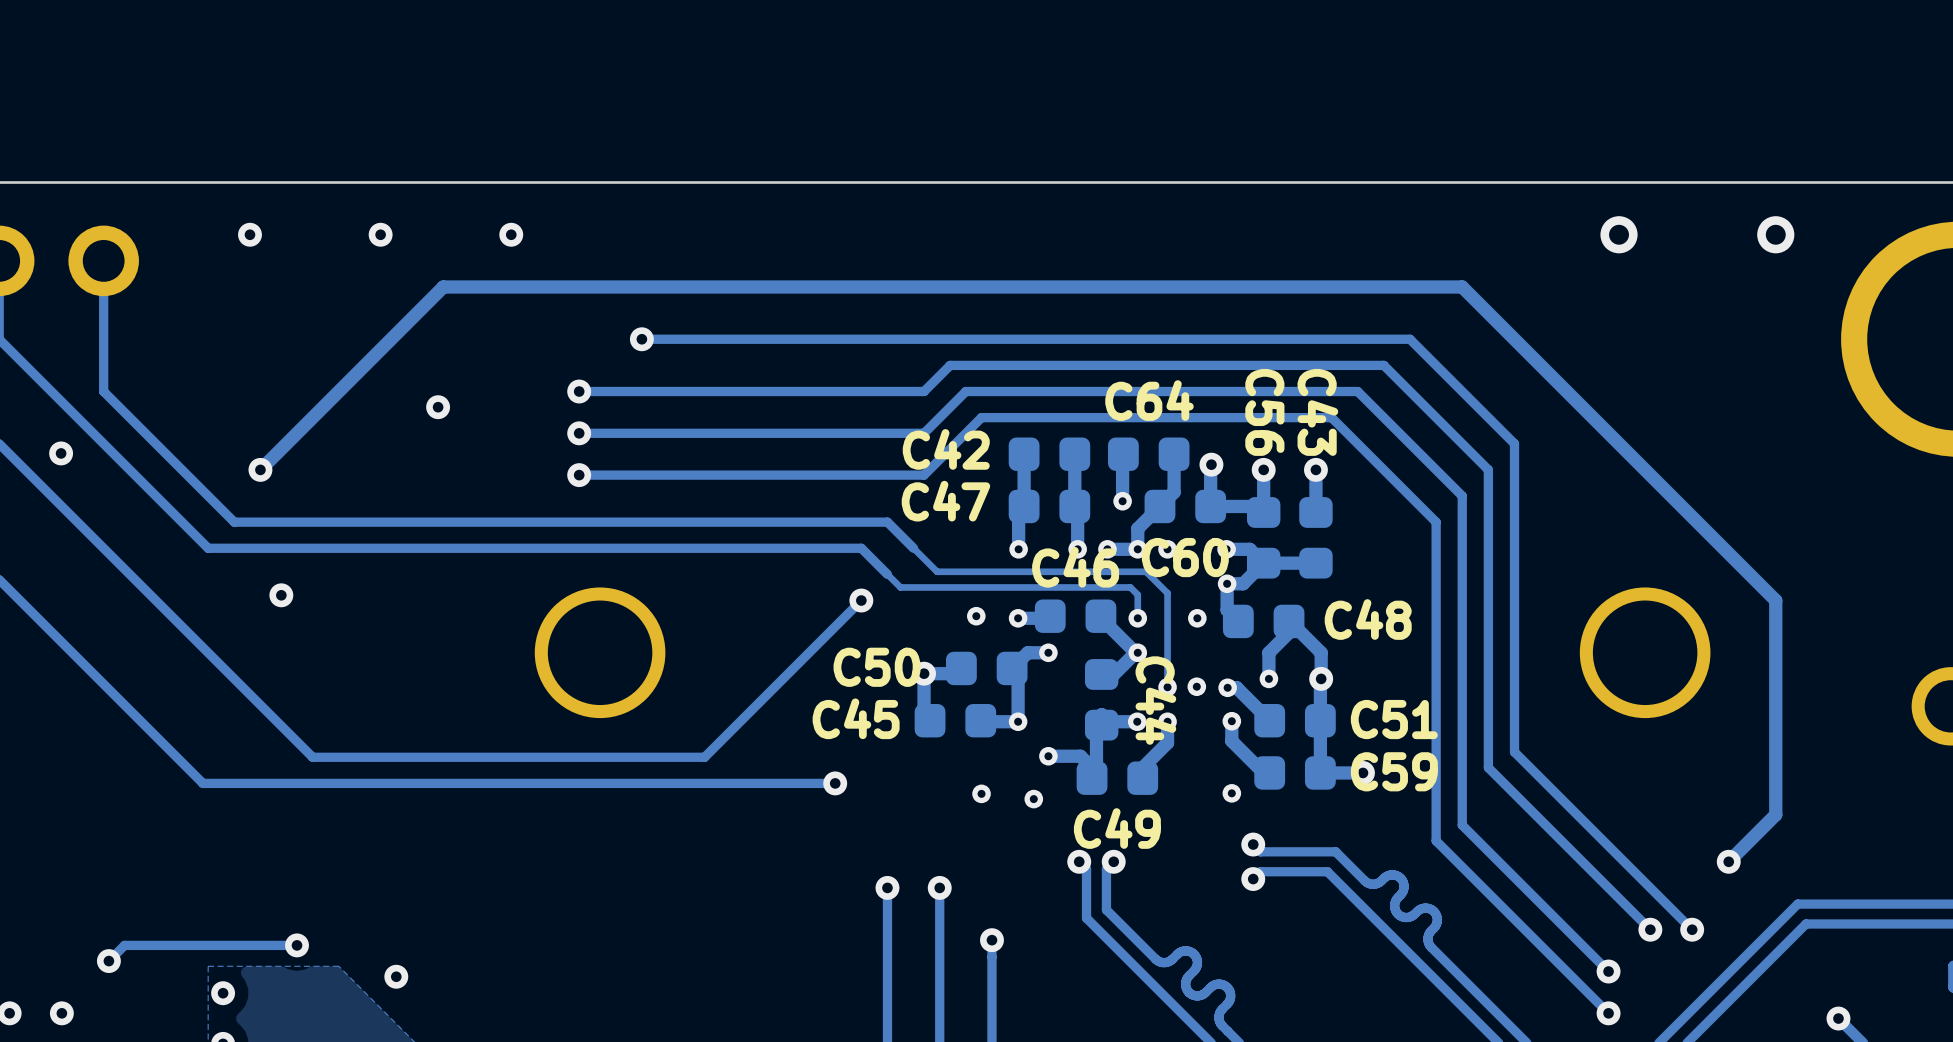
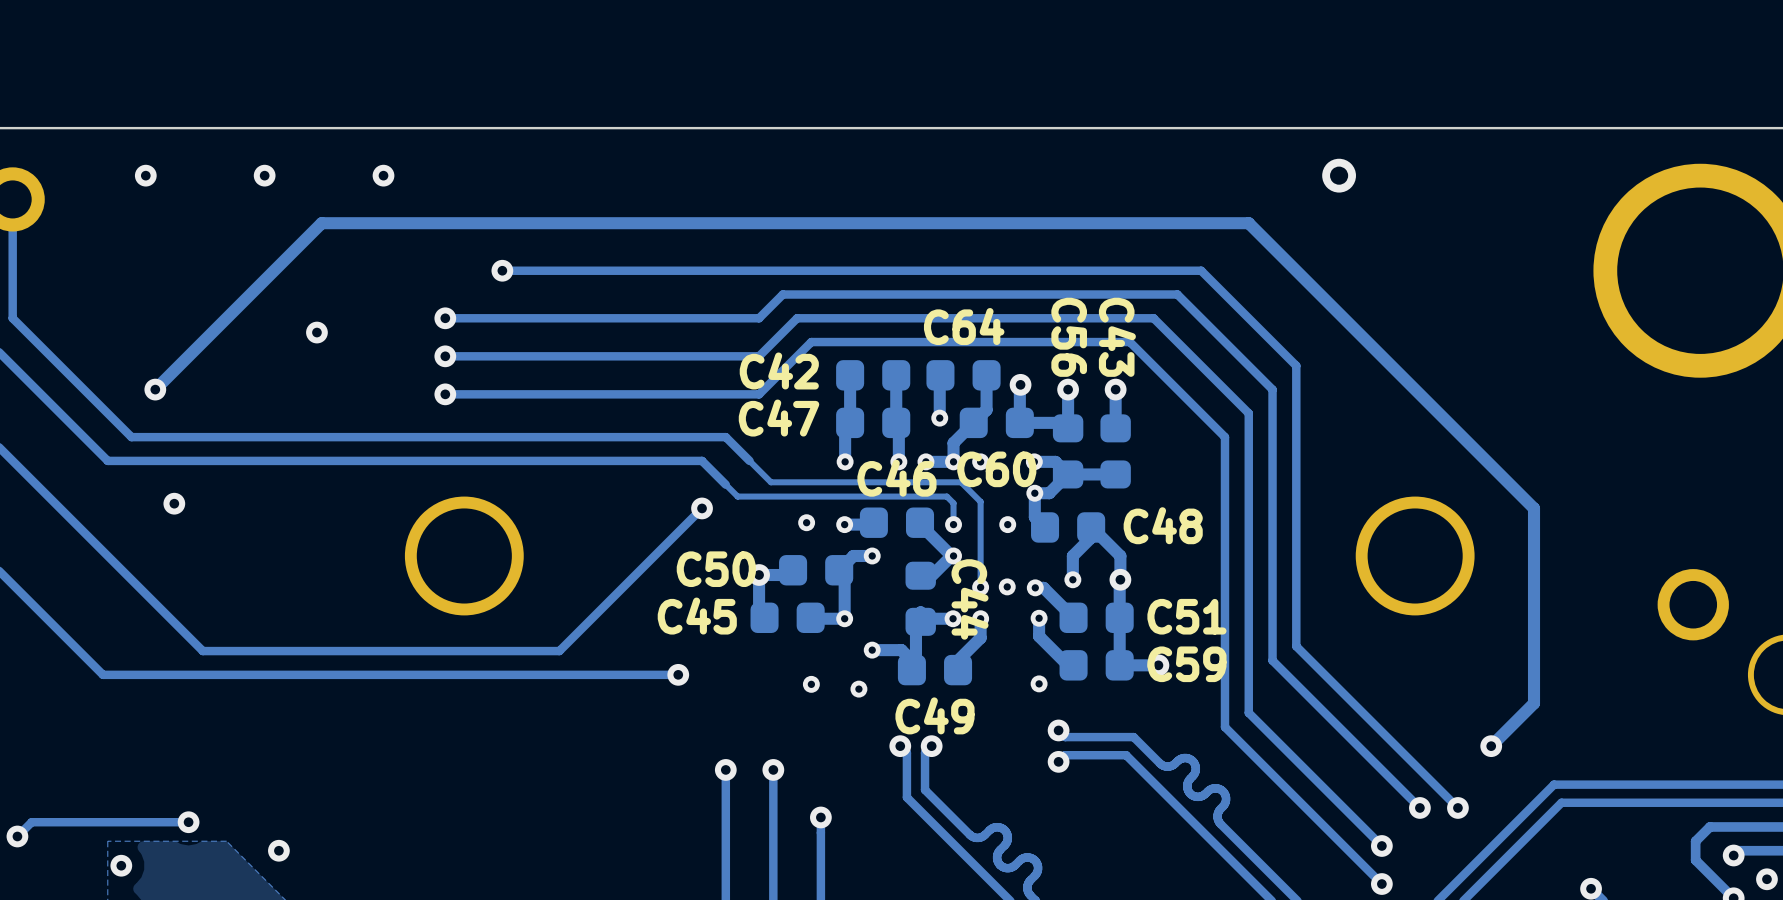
via position: (1619, 234) -> (1339, 175)
via: (1775, 234) -> none

